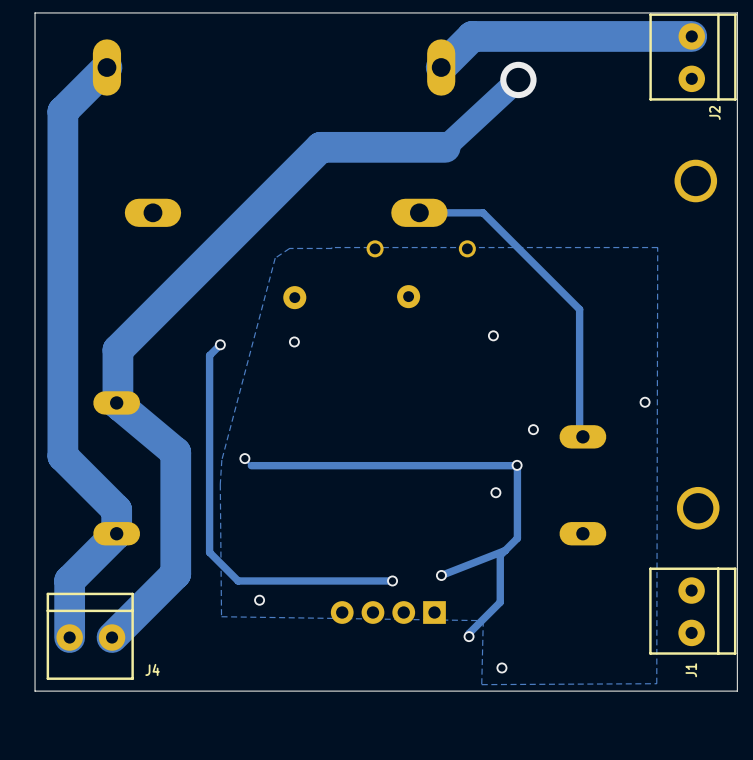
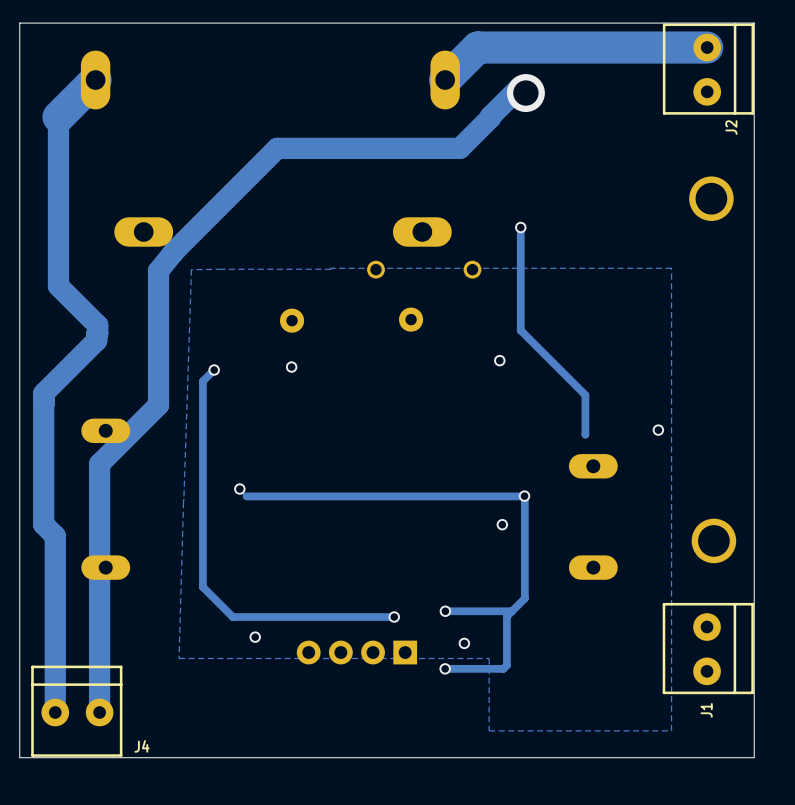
board edge: (737, 12) (35, 12) (35, 691) (737, 691) (737, 12) -> (754, 23) (754, 757) (19, 757) (19, 23) (754, 23)
track: none -> (517, 89) (459, 148) (277, 148) (176, 249) (158, 270) (158, 405) (99, 464) (99, 712)
track: (518, 79) (445, 147) (320, 147) (117, 350) (116, 402) (175, 452) (175, 573) (112, 637) -> none
track: (71, 102) (62, 111) (62, 456) (116, 509) (116, 533) (69, 580) (69, 637) -> (58, 117) (58, 286) (97, 325) (97, 333) (96, 340) (44, 392) (44, 402) (43, 393) (43, 524) (55, 536) (55, 712)
track: none -> (520, 227) (520, 330) (585, 395) (585, 434)
via: none -> (520, 227)
track: (419, 212) (483, 212) (579, 309) (579, 433) (582, 436) -> none
zone outline: (657, 247) (656, 683) (481, 684) (483, 620) (221, 616) (221, 460) (275, 258) (289, 248) -> (671, 268) (671, 730) (489, 730) (489, 658) (179, 658) (191, 269) (286, 269)
via: (533, 429) -> none
track: (517, 538) (500, 555) (500, 580) -> (524, 572) (524, 598) (506, 616)
track: (505, 550) (441, 575) -> (512, 611) (445, 611)
track: (500, 602) (469, 633) (469, 636) -> (506, 639) (506, 665) (503, 668) (445, 668)
via: none -> (464, 643)
part position: (388, 612) -> (356, 652)
via: none -> (445, 668)
J4 position: (90, 636) -> (76, 711)
via: (469, 636) -> none
via: (501, 667) -> none

